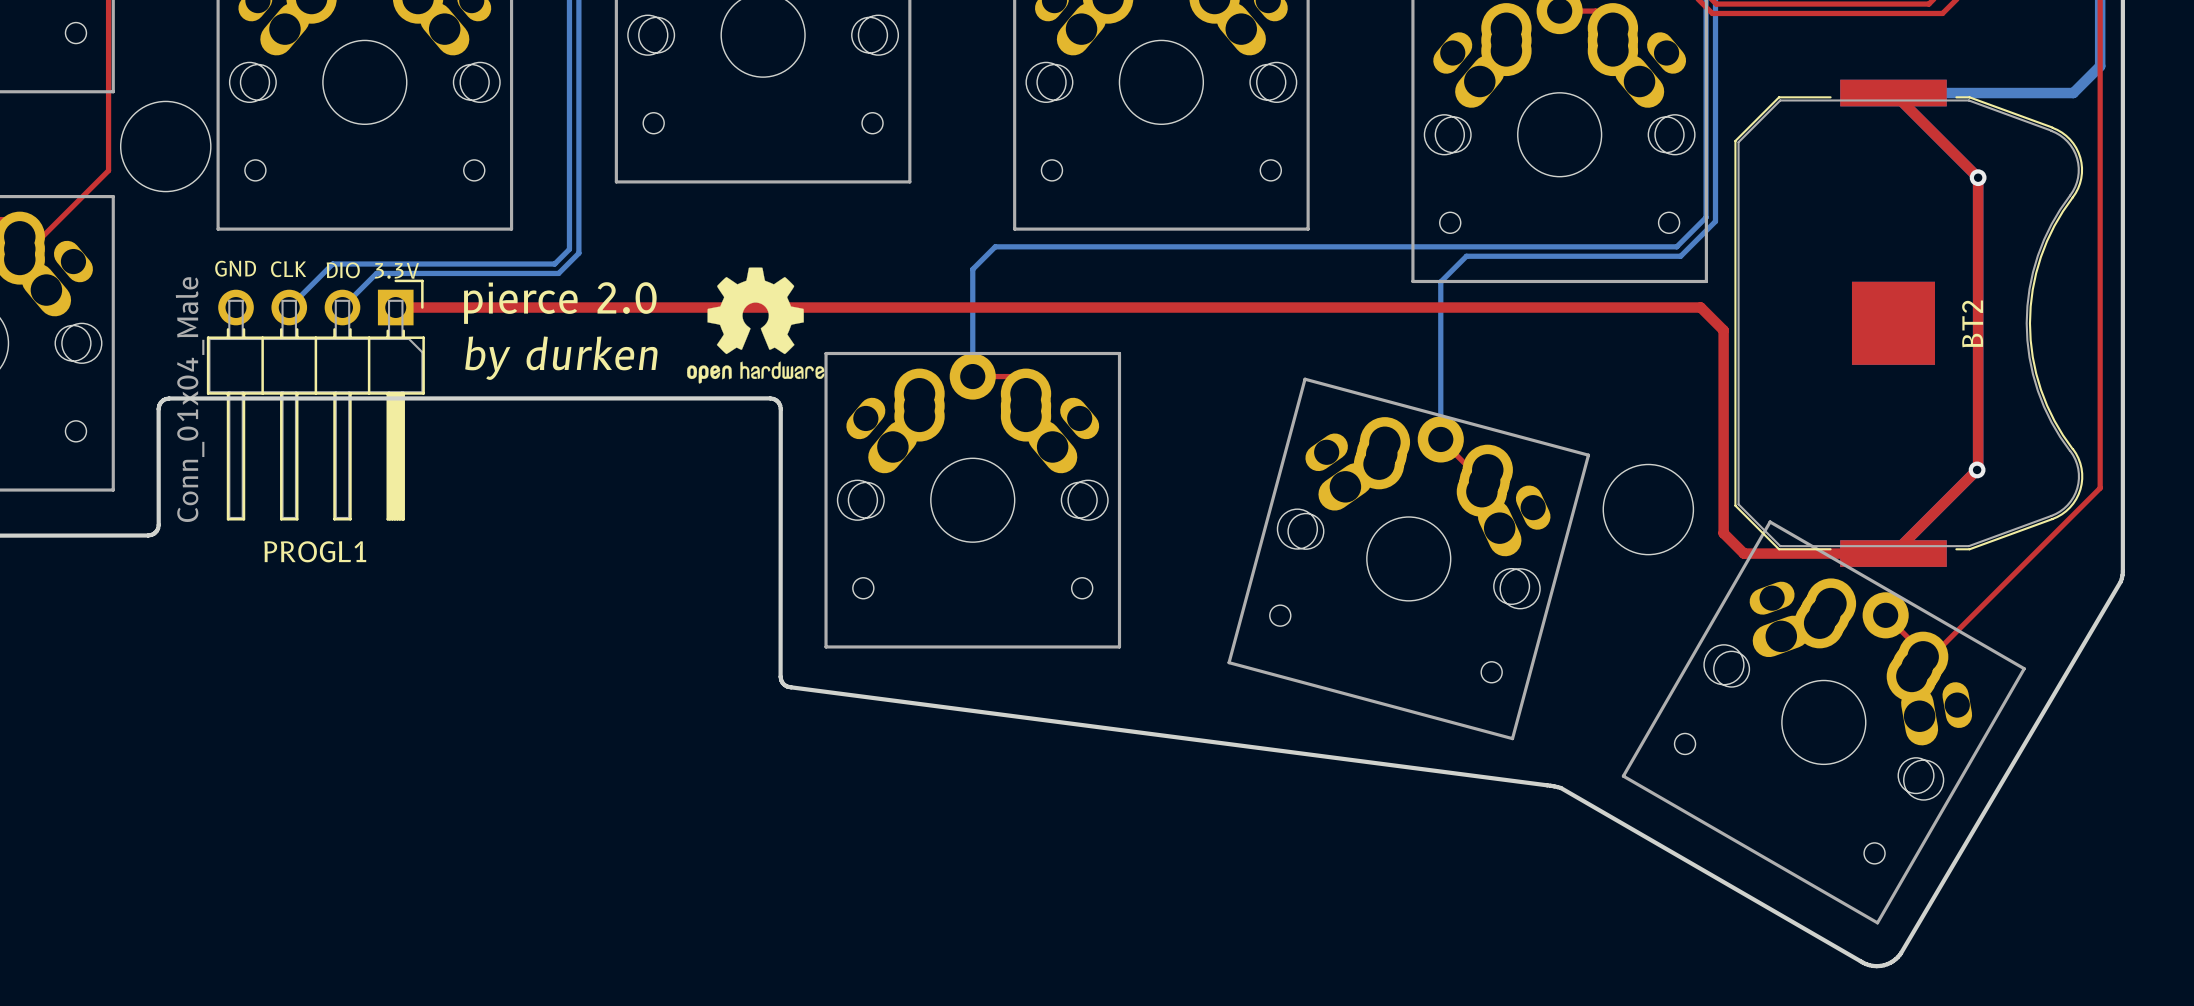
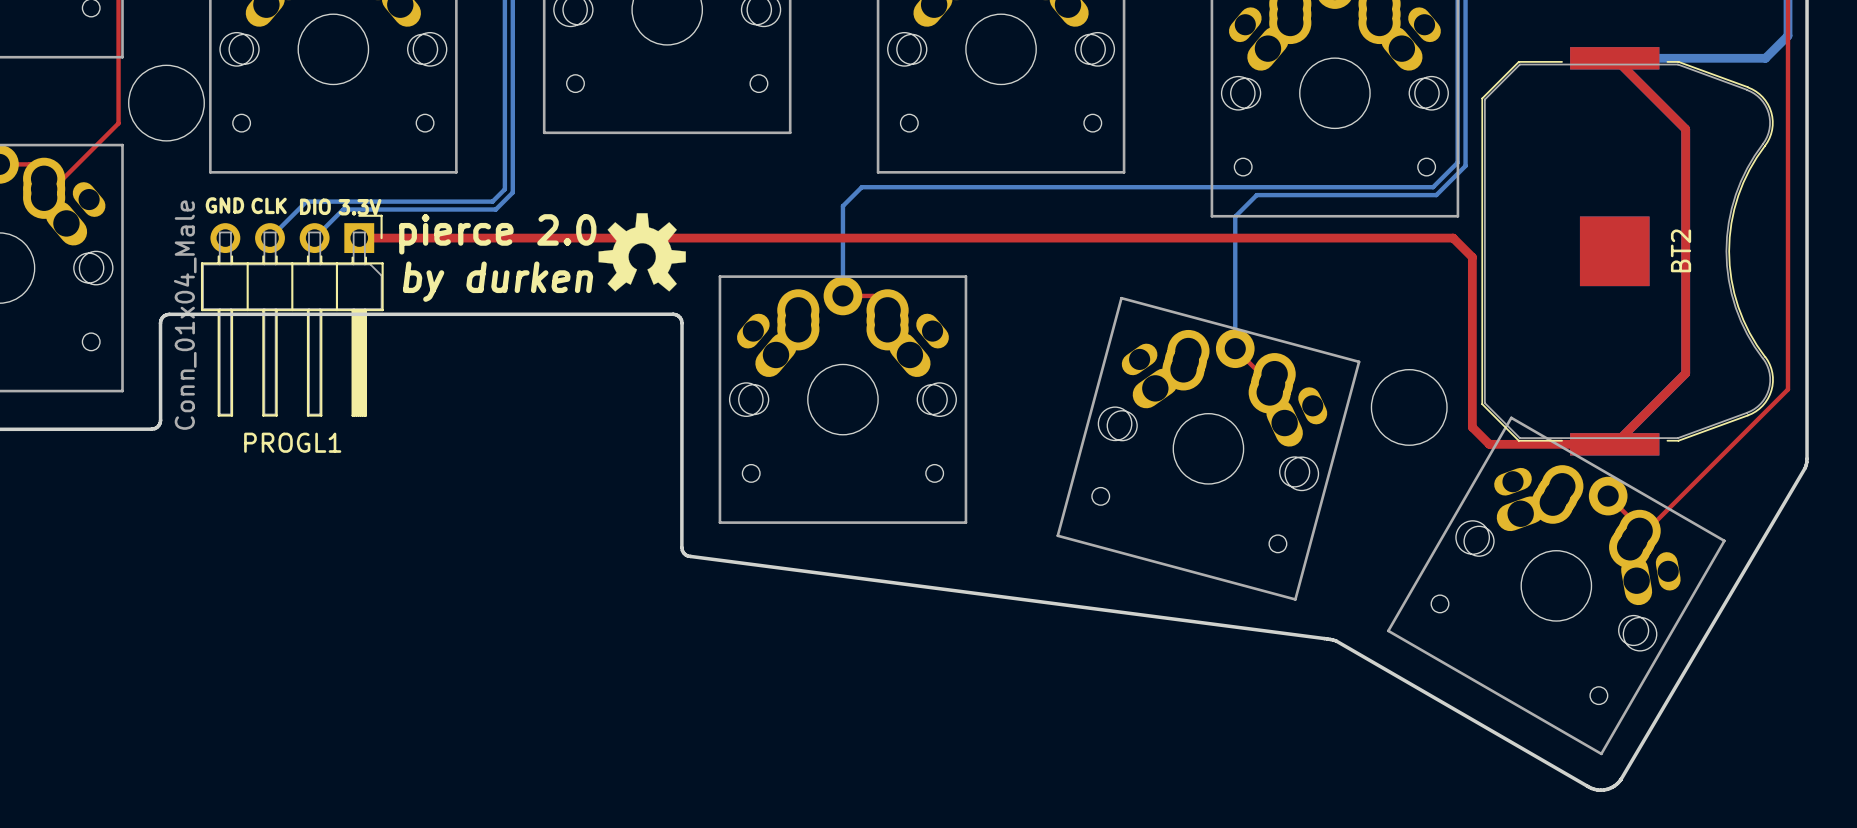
via: (1978, 177) -> none
drawing: [687, 267, 825, 384] -> none
drawing: none -> [598, 213, 686, 292]
via: (1977, 469) -> none

